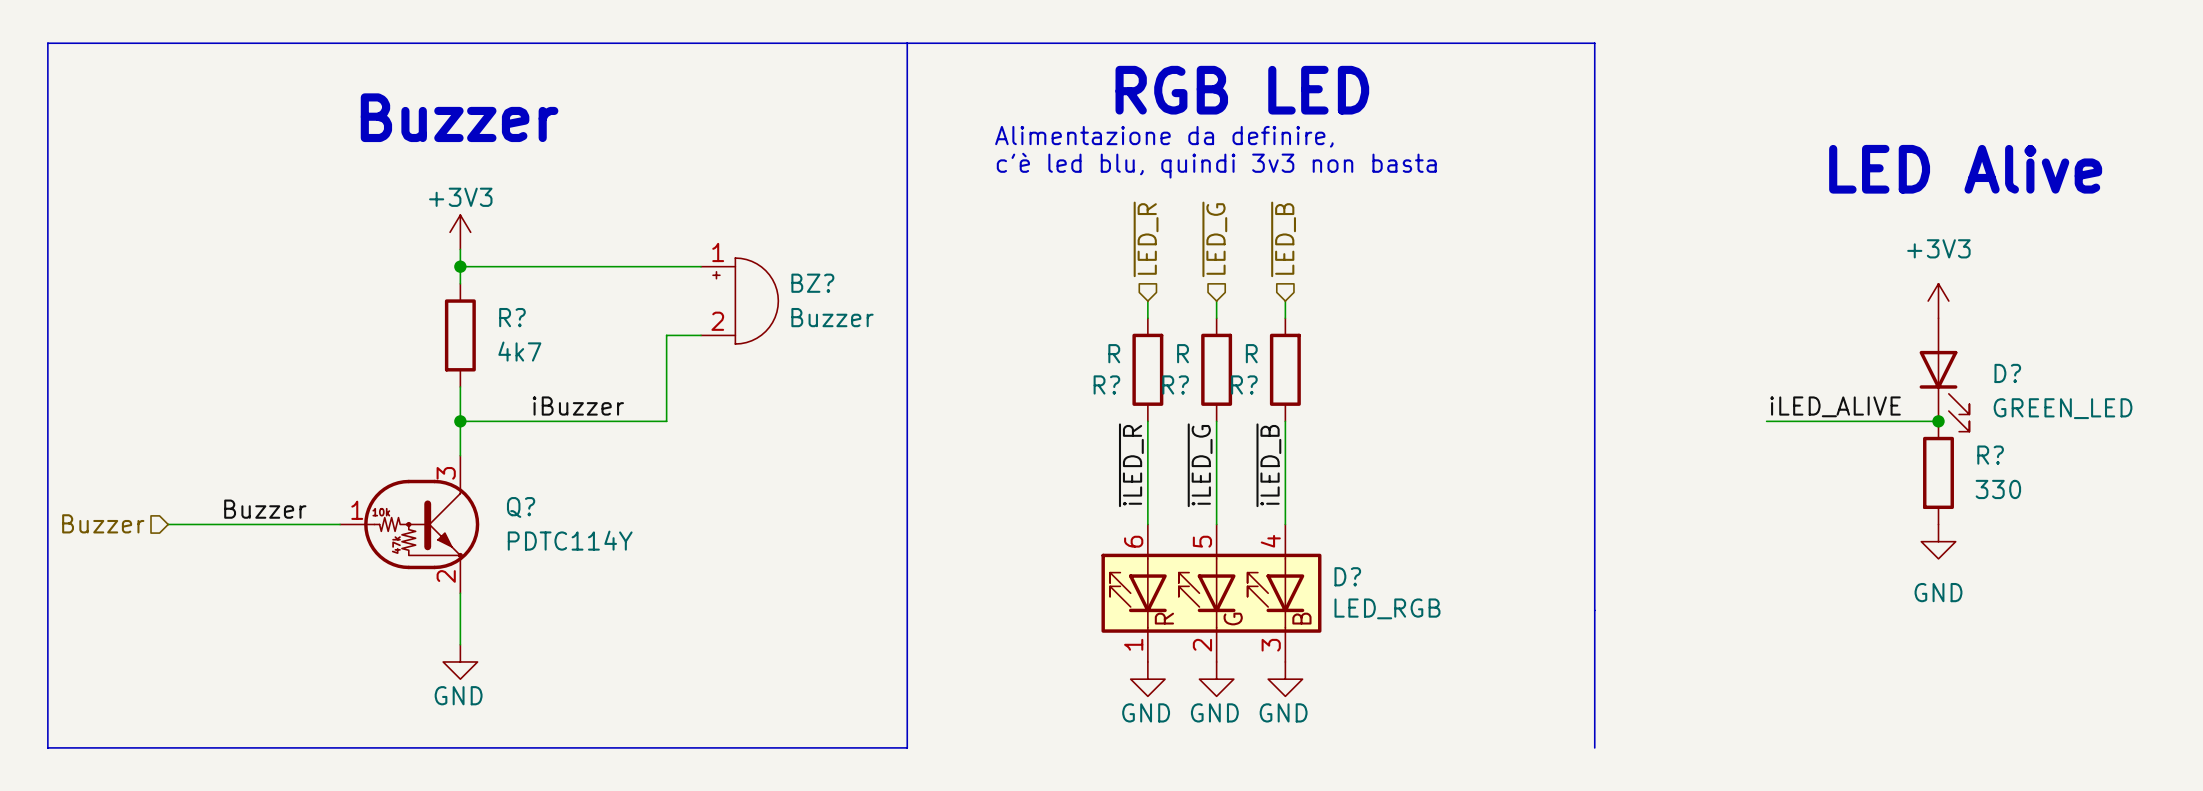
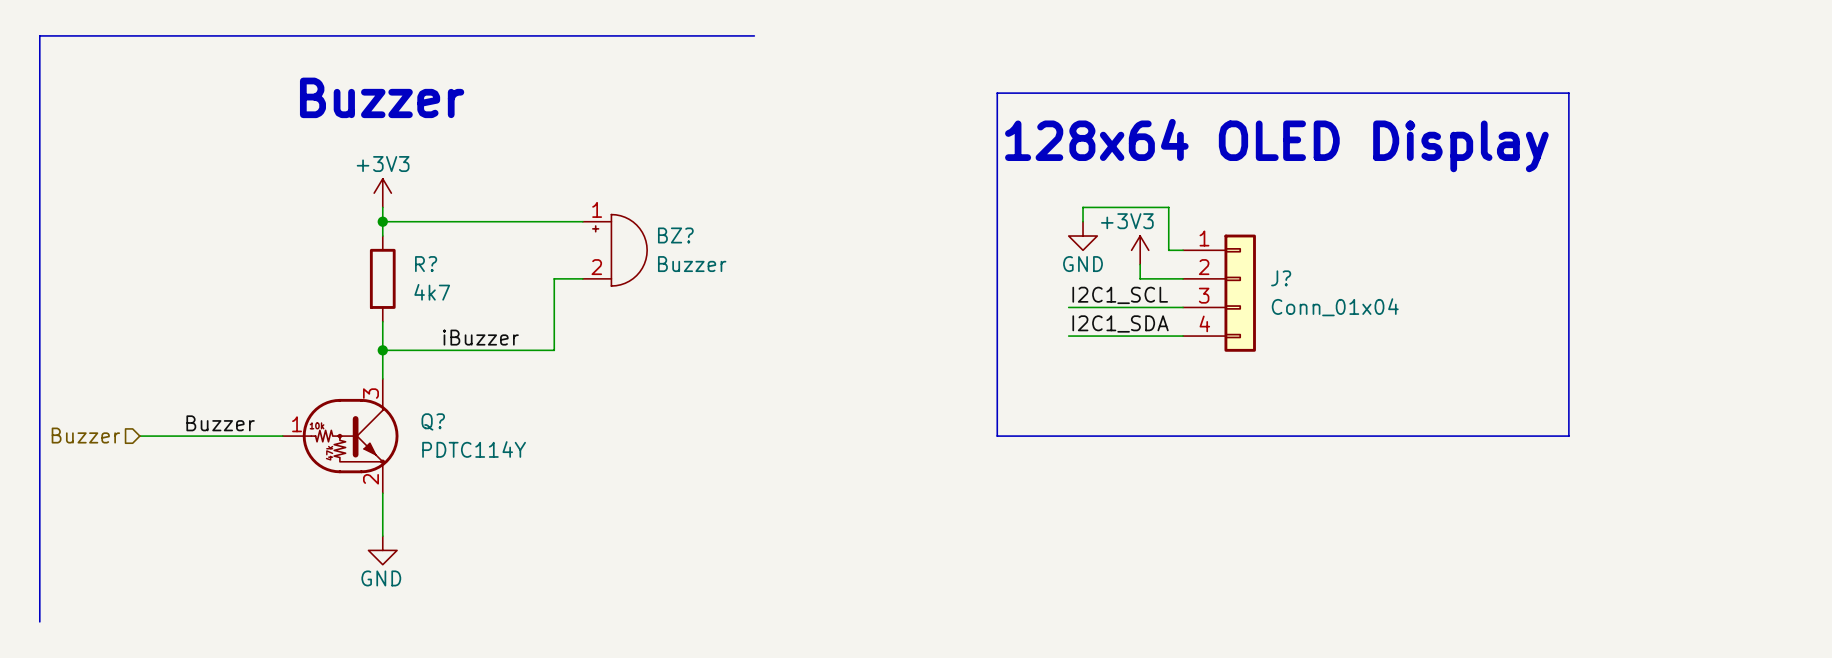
text: RGB LED (1242, 90) -> none
line: none -> (997, 93) (1568, 93) (1568, 436) (997, 436) (997, 93)
text: Alimentazione da definire, (1164, 136) -> none
text: c'è led blu, quindi 3v3 non basta (1216, 165) -> none
text: LED Alive (1965, 169) -> none
text: none -> 128x64 OLED Display (1276, 145)
hierarchical label: ~{LED_R} (1146, 239) -> none
hierarchical label: ~{LED_G} (1214, 239) -> none
hierarchical label: ~{LED_B} (1283, 239) -> none
wire: none -> (1083, 221) (1083, 207) (1168, 207) (1168, 250) (1183, 250)
power symbol: none -> GND (1083, 236)
wire: (1147, 301) (1147, 318) -> none
wire: (1216, 301) (1216, 318) -> none
wire: (1285, 301) (1285, 318) -> none
power symbol: none -> +3V3 (1140, 250)
power symbol: +3V3 (1938, 301) -> none
wire: none -> (1140, 264) (1140, 278) (1183, 278)
J?: none -> Conn_01x04 (1219, 293)
label: none -> I2C1_SCL (1120, 295)
R?: R (1147, 369) -> none
R?: R (1216, 369) -> none
wire: none -> (1068, 307) (1183, 307)
R?: R (1285, 369) -> none
D?: GREEN_LED (1944, 374) -> none
label: none -> I2C1_SDA (1120, 323)
wire: none -> (1068, 336) (1183, 336)
label: iLED_ALIVE (1835, 406) -> none
wire: (1147, 421) (1147, 524) -> none
wire: (1216, 421) (1216, 524) -> none
wire: (1285, 421) (1285, 524) -> none
wire: (1766, 421) (1938, 421) -> none
junction: (1938, 421) -> none
label: ~{iLED_R} (1131, 465) -> none
label: ~{iLED_G} (1200, 465) -> none
label: ~{iLED_B} (1268, 465) -> none
R?: 330 (1938, 472) -> none
power symbol: GND (1938, 541) -> none
D?: LED_RGB (1211, 593) -> none
power symbol: GND (1147, 679) -> none
power symbol: GND (1216, 679) -> none
power symbol: GND (1285, 679) -> none
line: (47, 747) (907, 747) (907, 43) (1594, 43) (1594, 747) -> none

